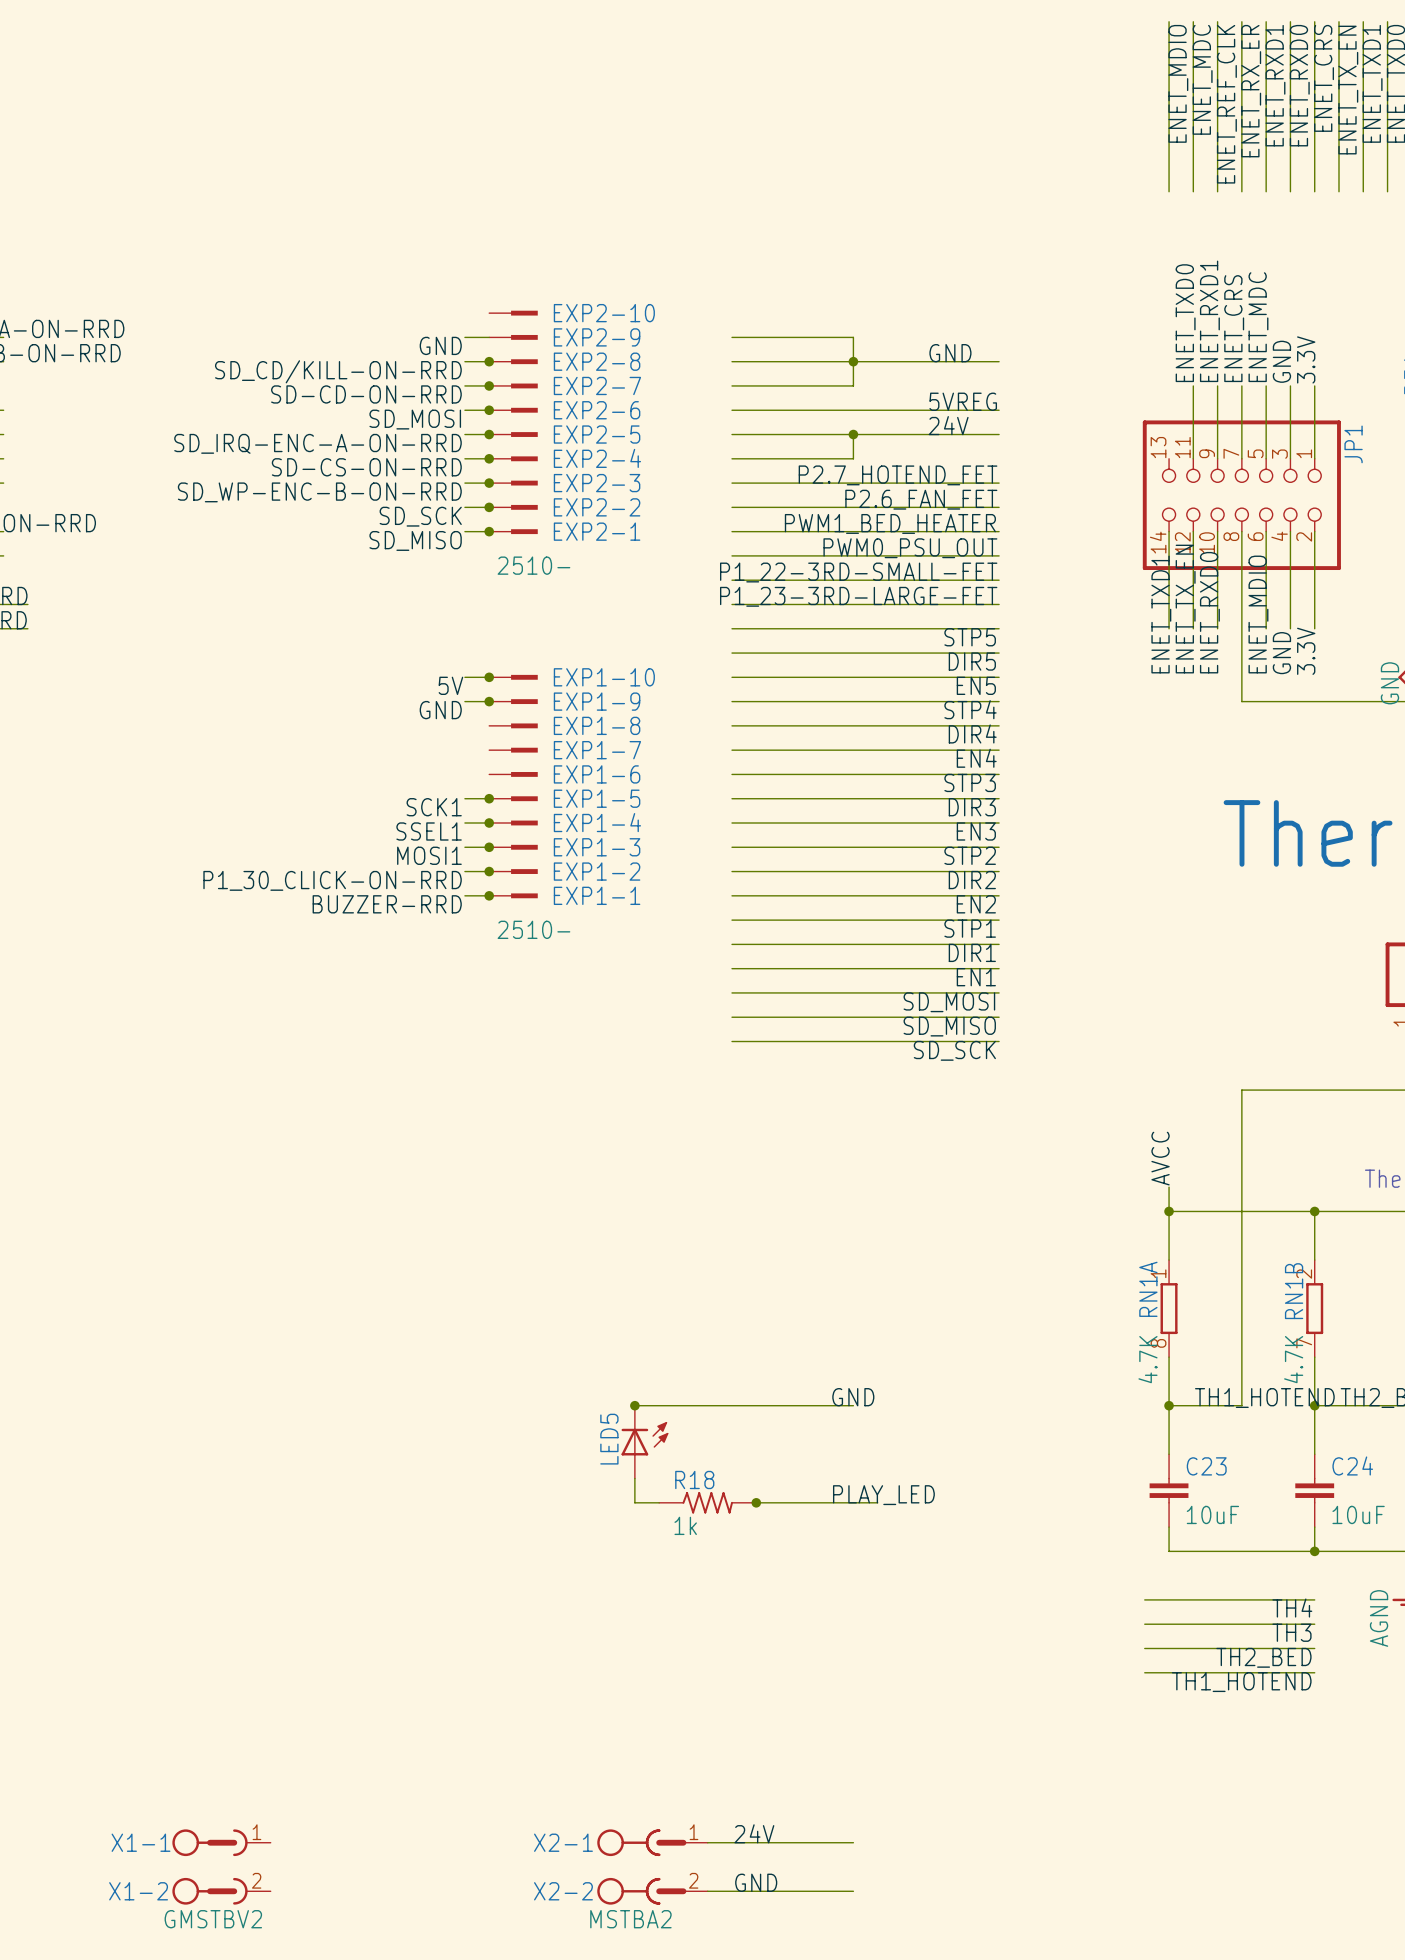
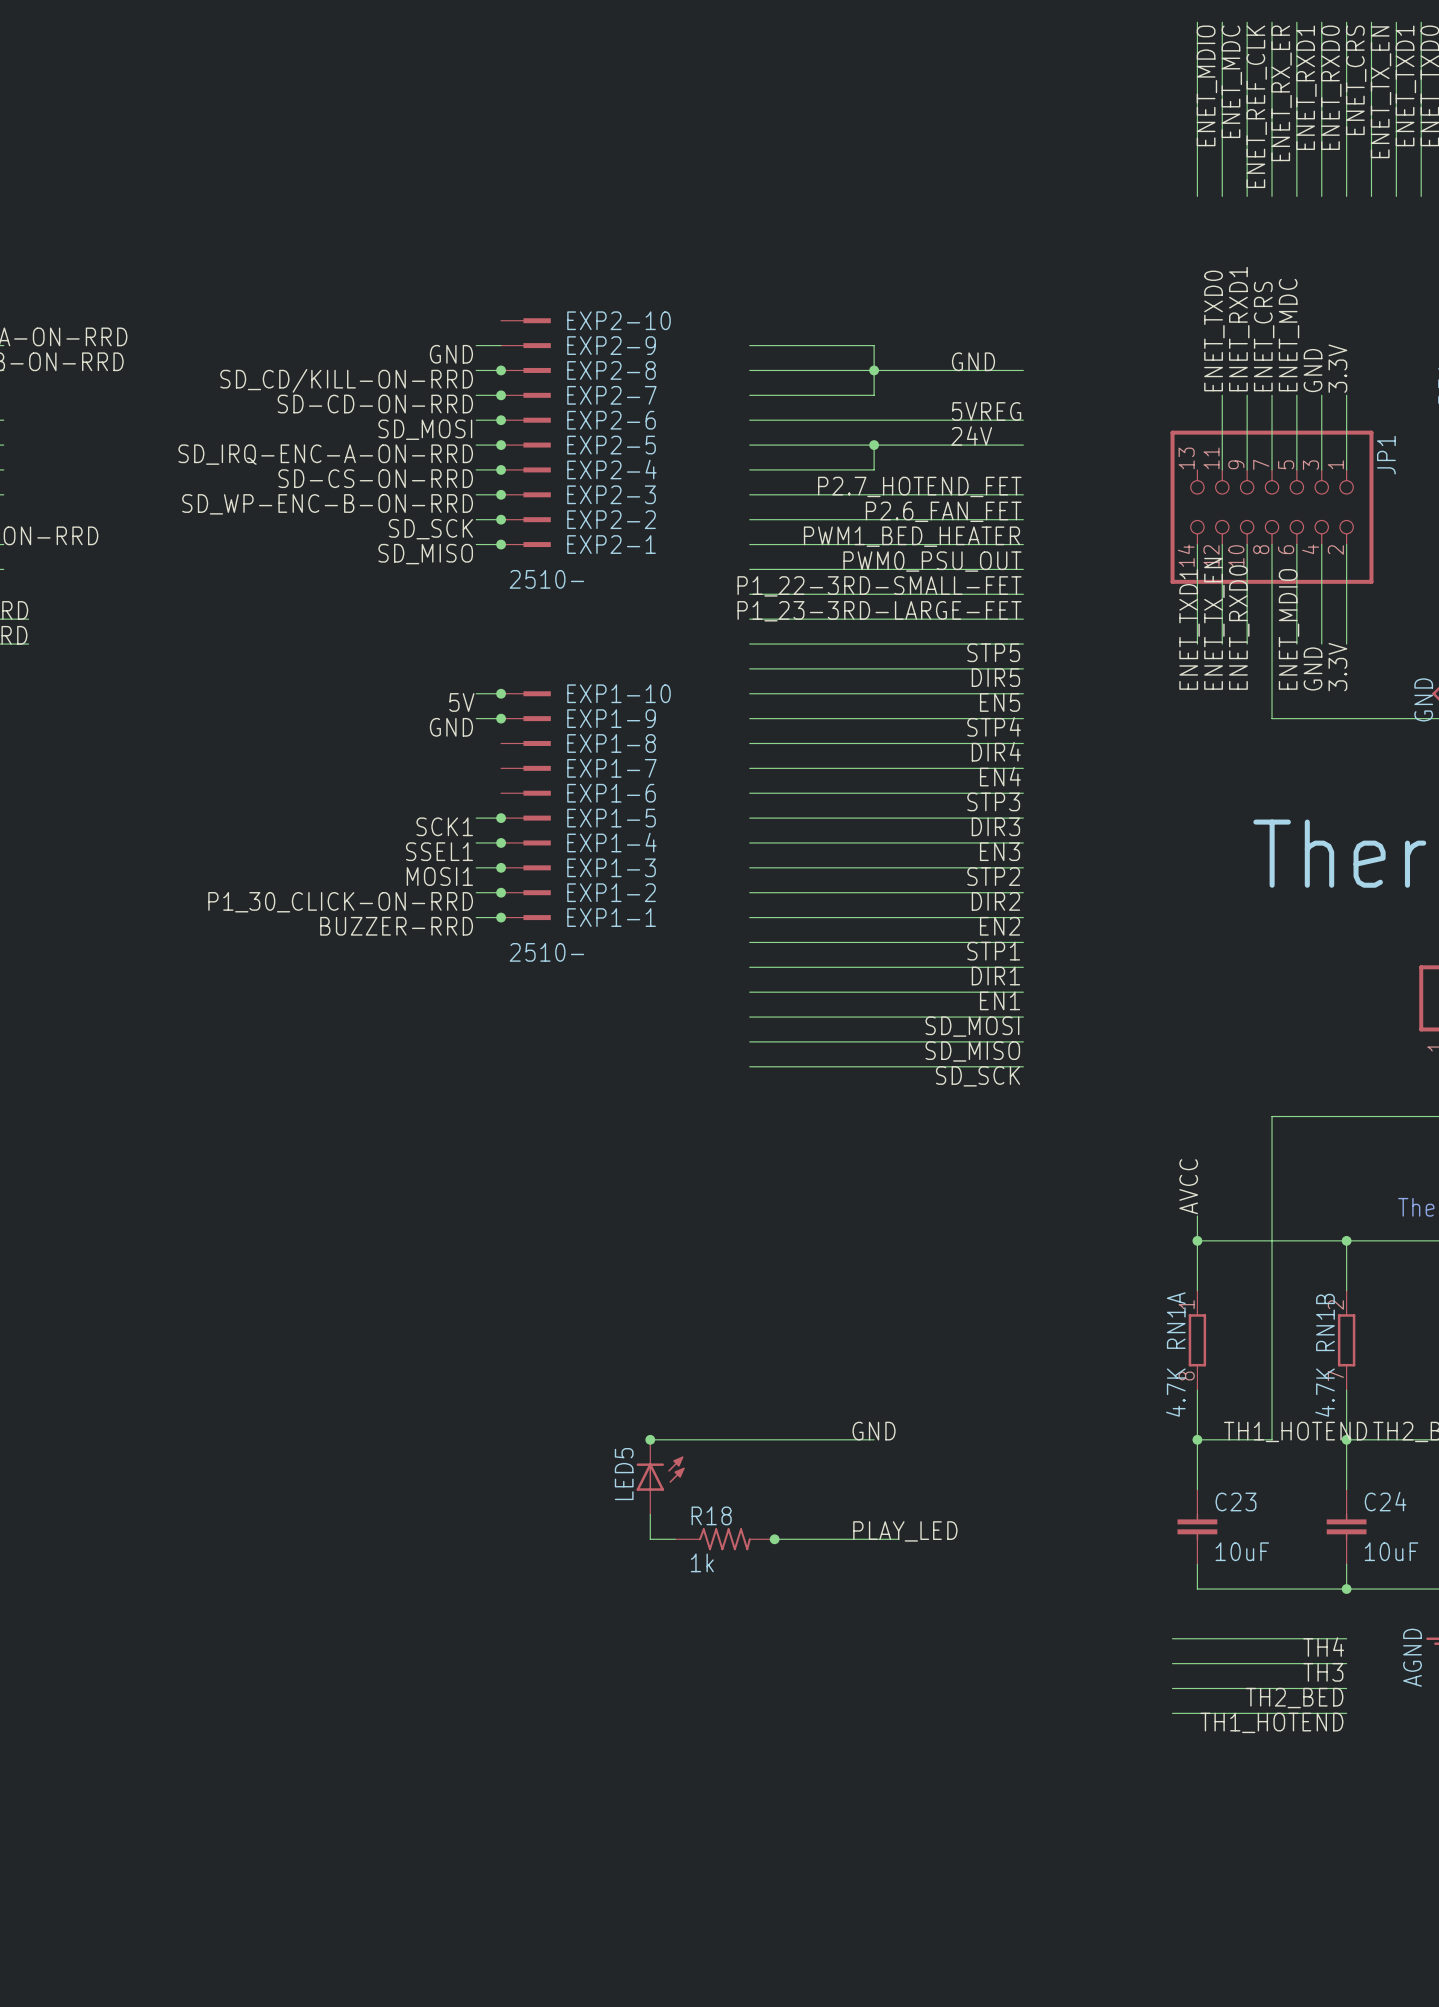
label: 24V (754, 1833) -> none
X1-1: (221, 1842) -> none
X2-1: (652, 1842) -> none
wire: (707, 1842) (853, 1842) -> none
label: GND (756, 1882) -> none
X1-2: GMSTBV2 (221, 1891) -> none
X2-2: MSTBA2 (652, 1891) -> none
wire: (707, 1891) (853, 1891) -> none

